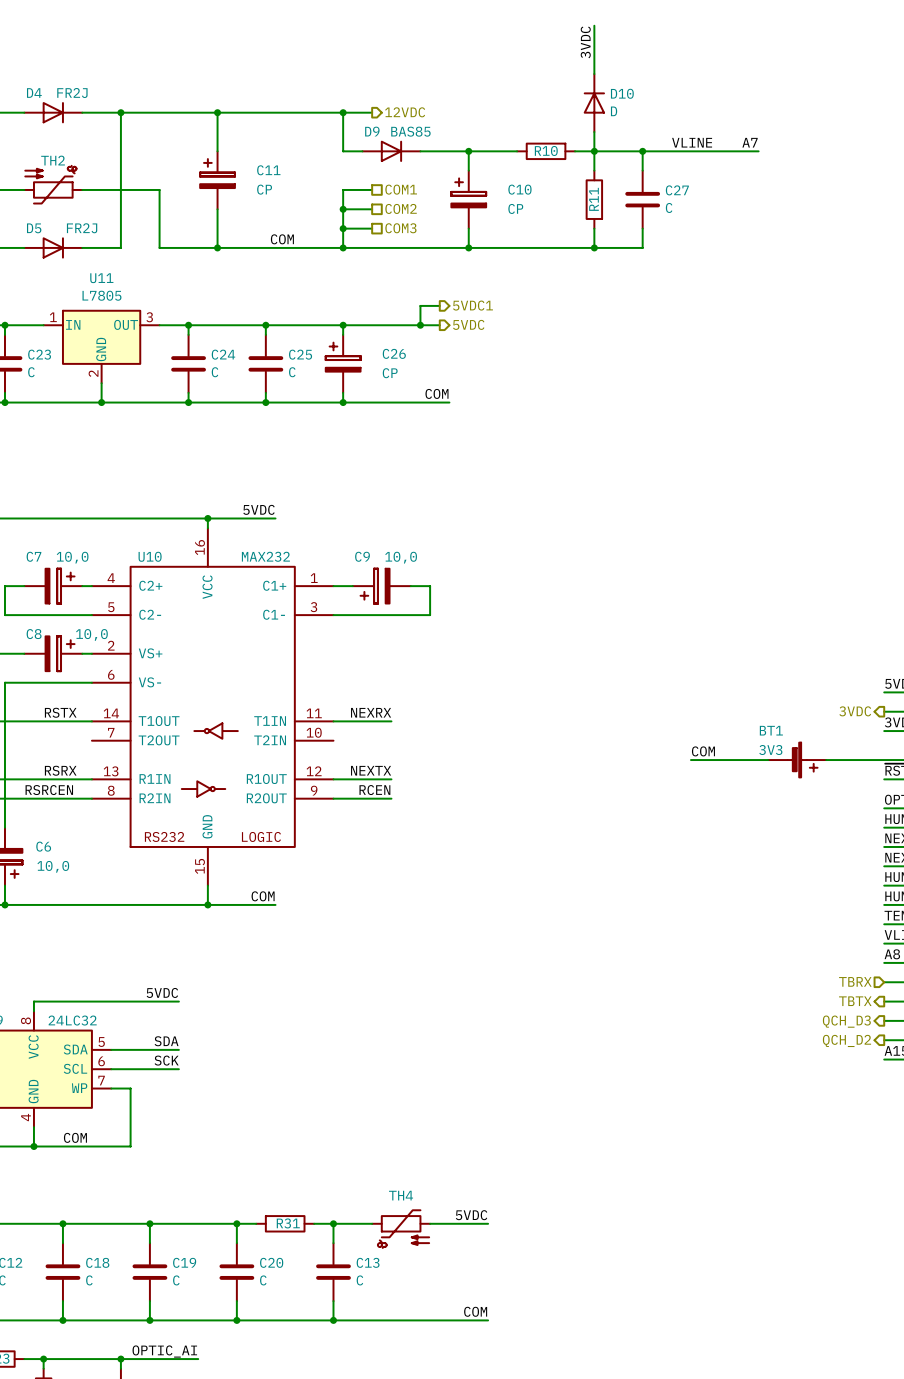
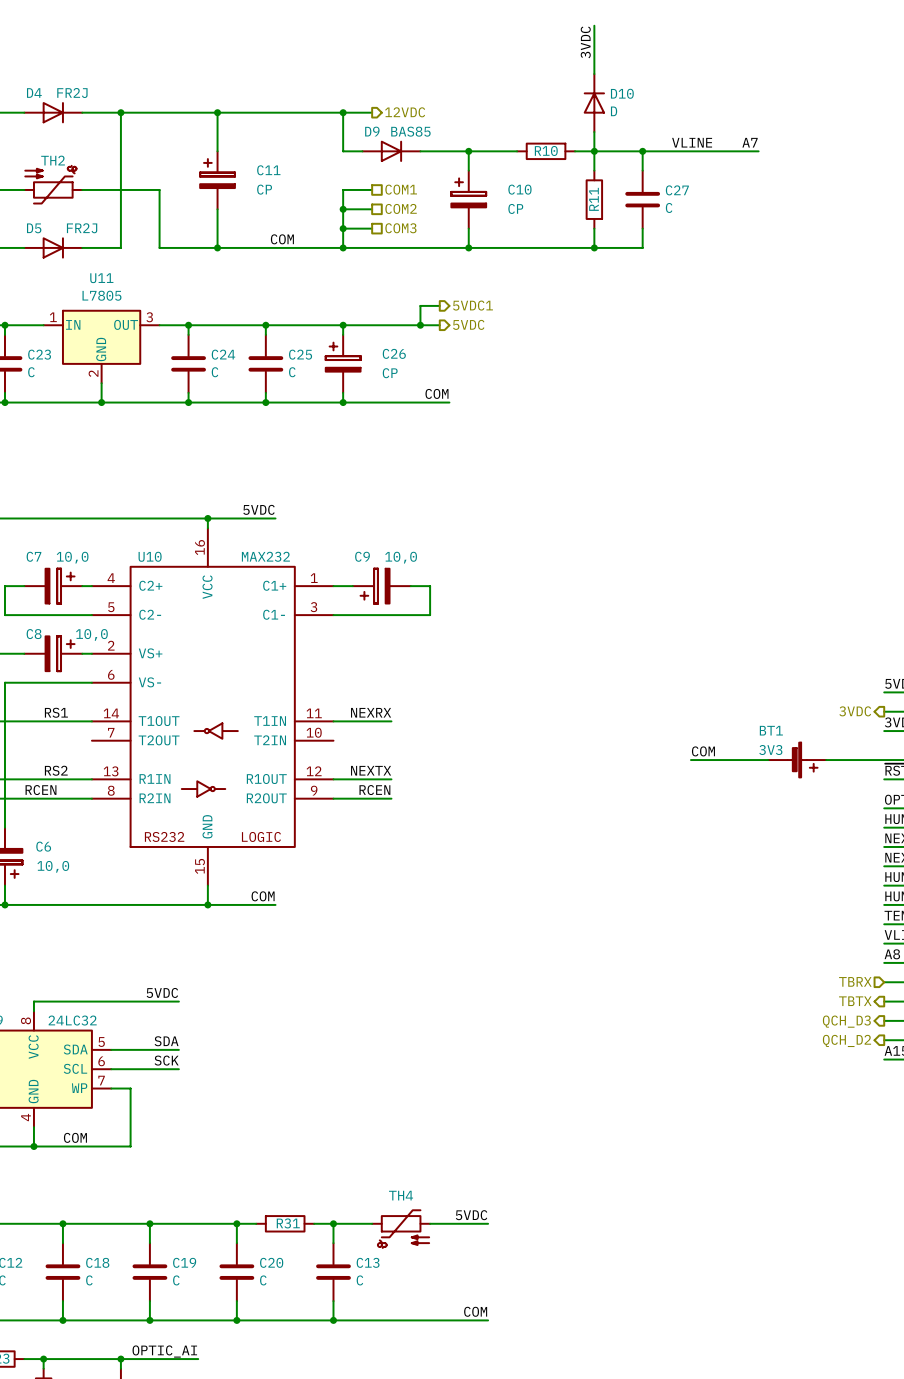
label: RSTX (60, 712) -> RS1 (56, 712)
label: RSRX (60, 770) -> RS2 (56, 770)
label: RSRCEN (49, 790) -> RCEN (40, 790)

